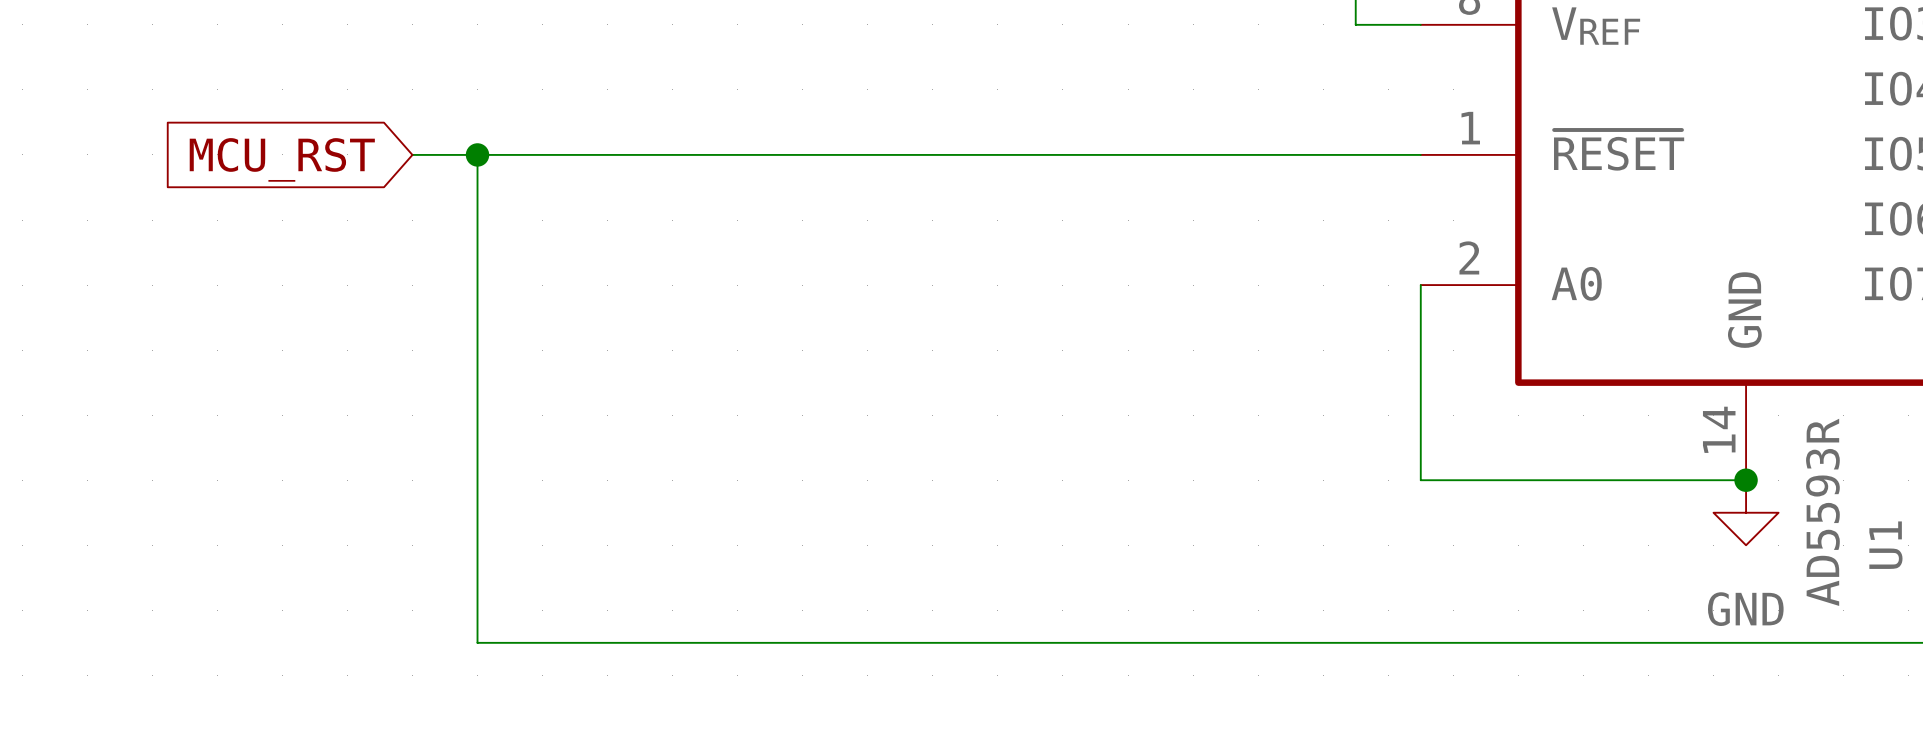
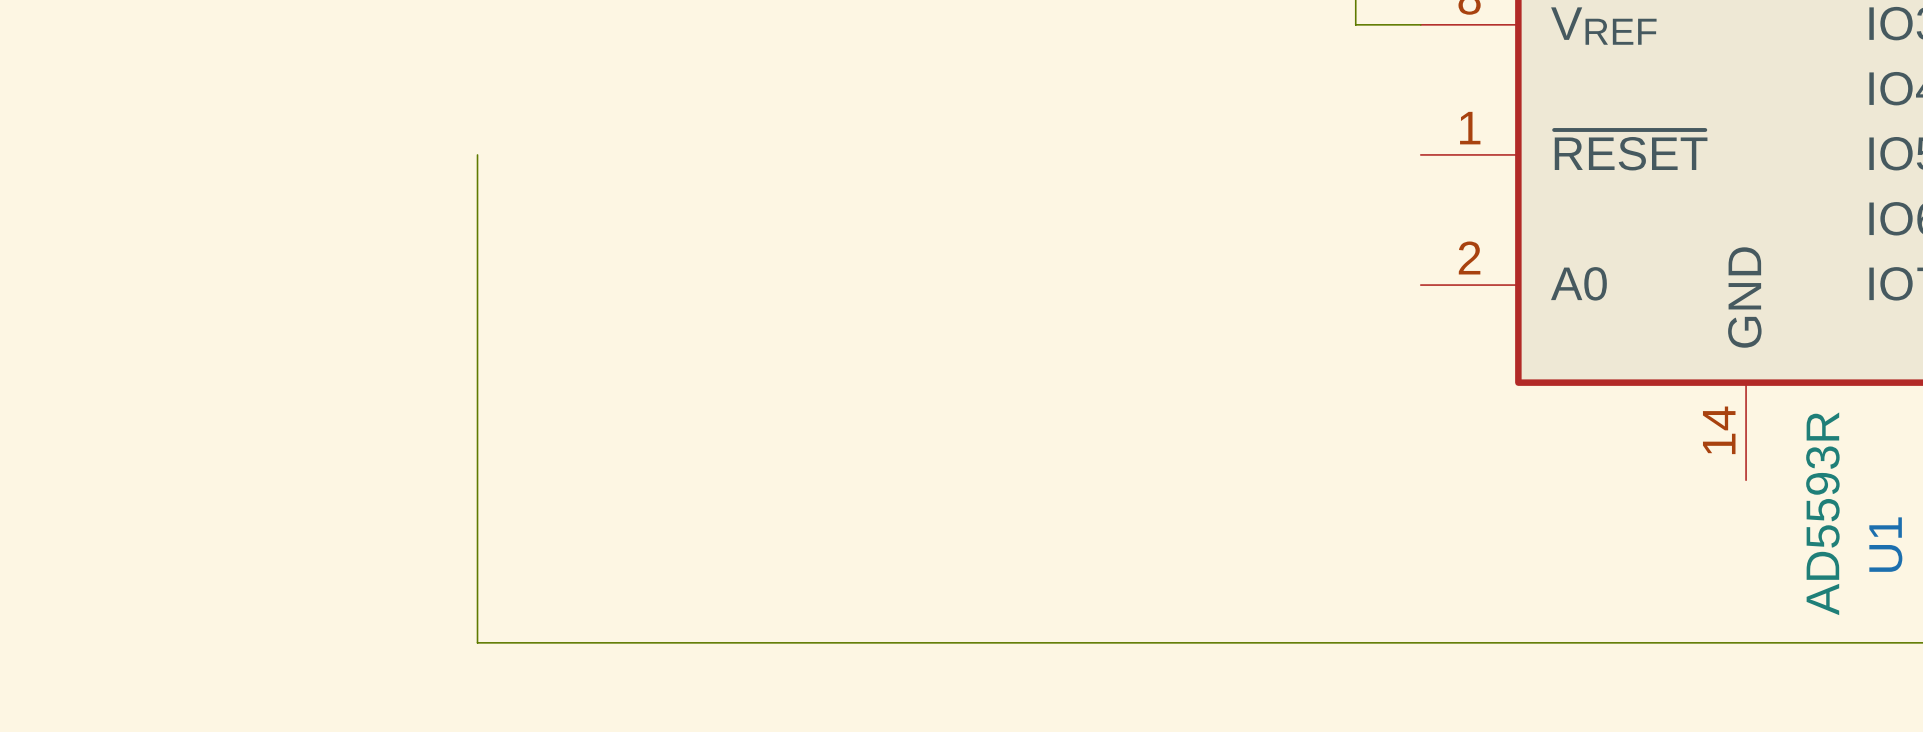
wire: (412, 154) (1420, 154) -> none
junction: (477, 154) -> none
global label: MCU_RST (282, 159) -> none
wire: (1420, 285) (1420, 480) (1746, 480) -> none
junction: (1746, 480) -> none
power symbol: GND (1746, 512) -> none

